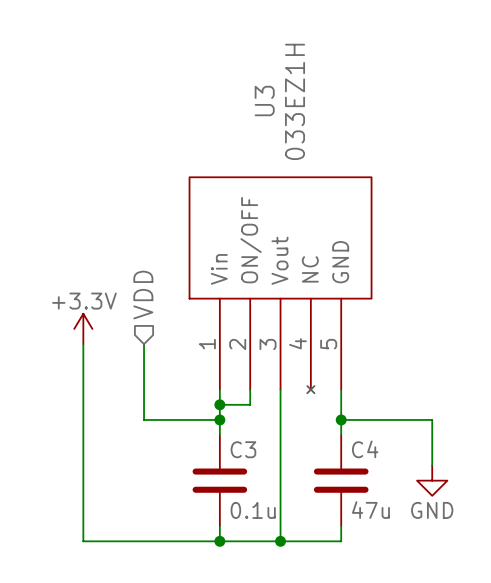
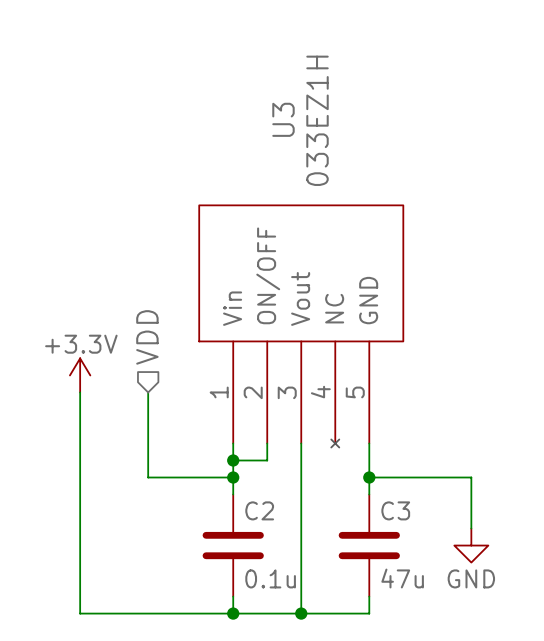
C3 name: C3 (243, 449) -> C2 (259, 510)
C4 name: C4 (365, 449) -> C3 (395, 510)

